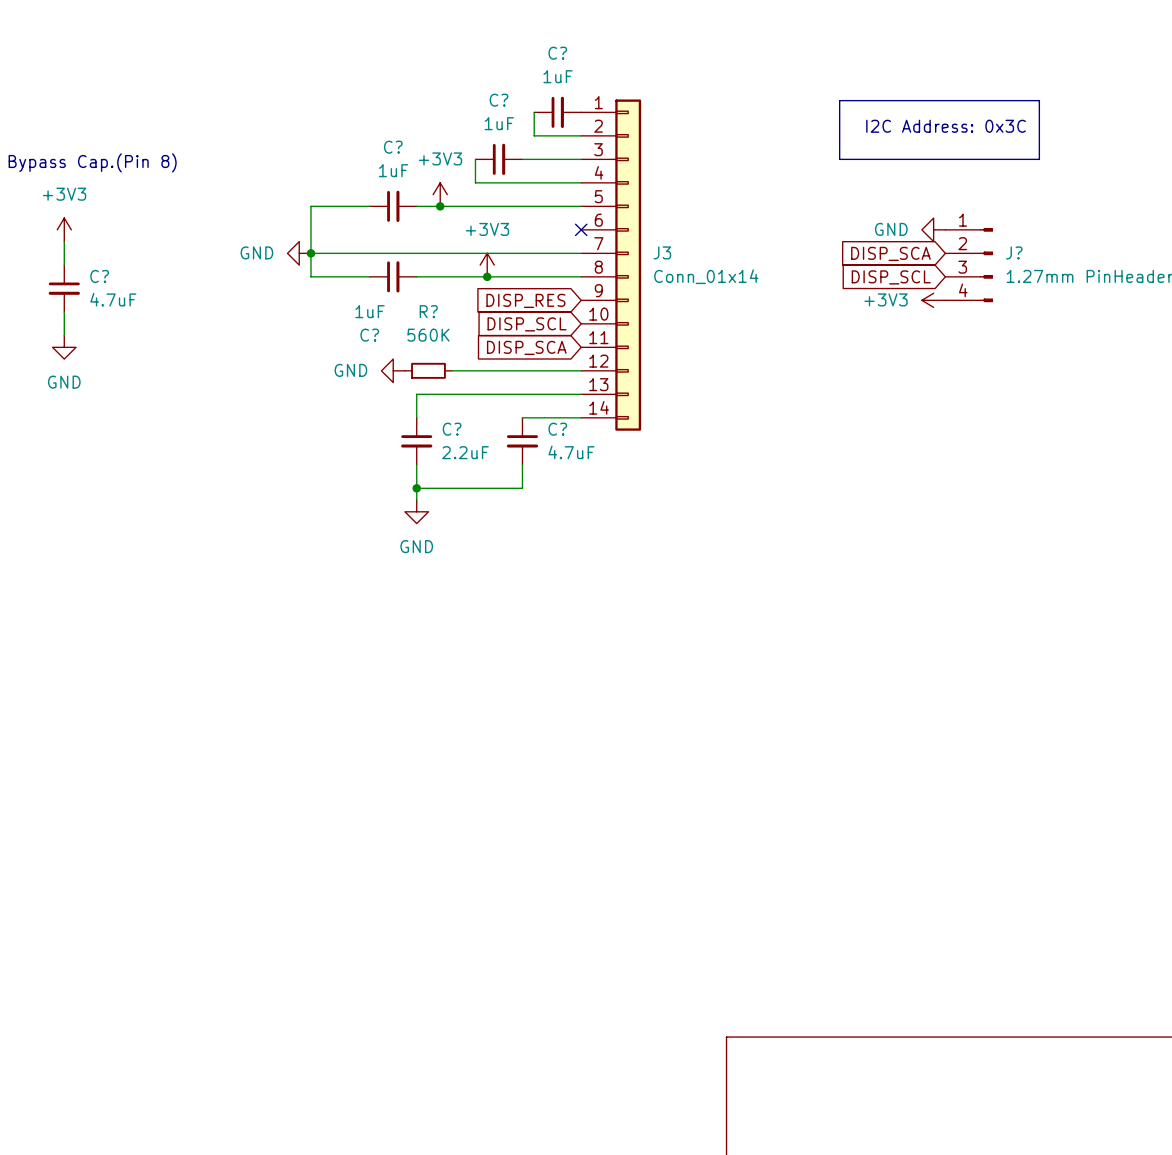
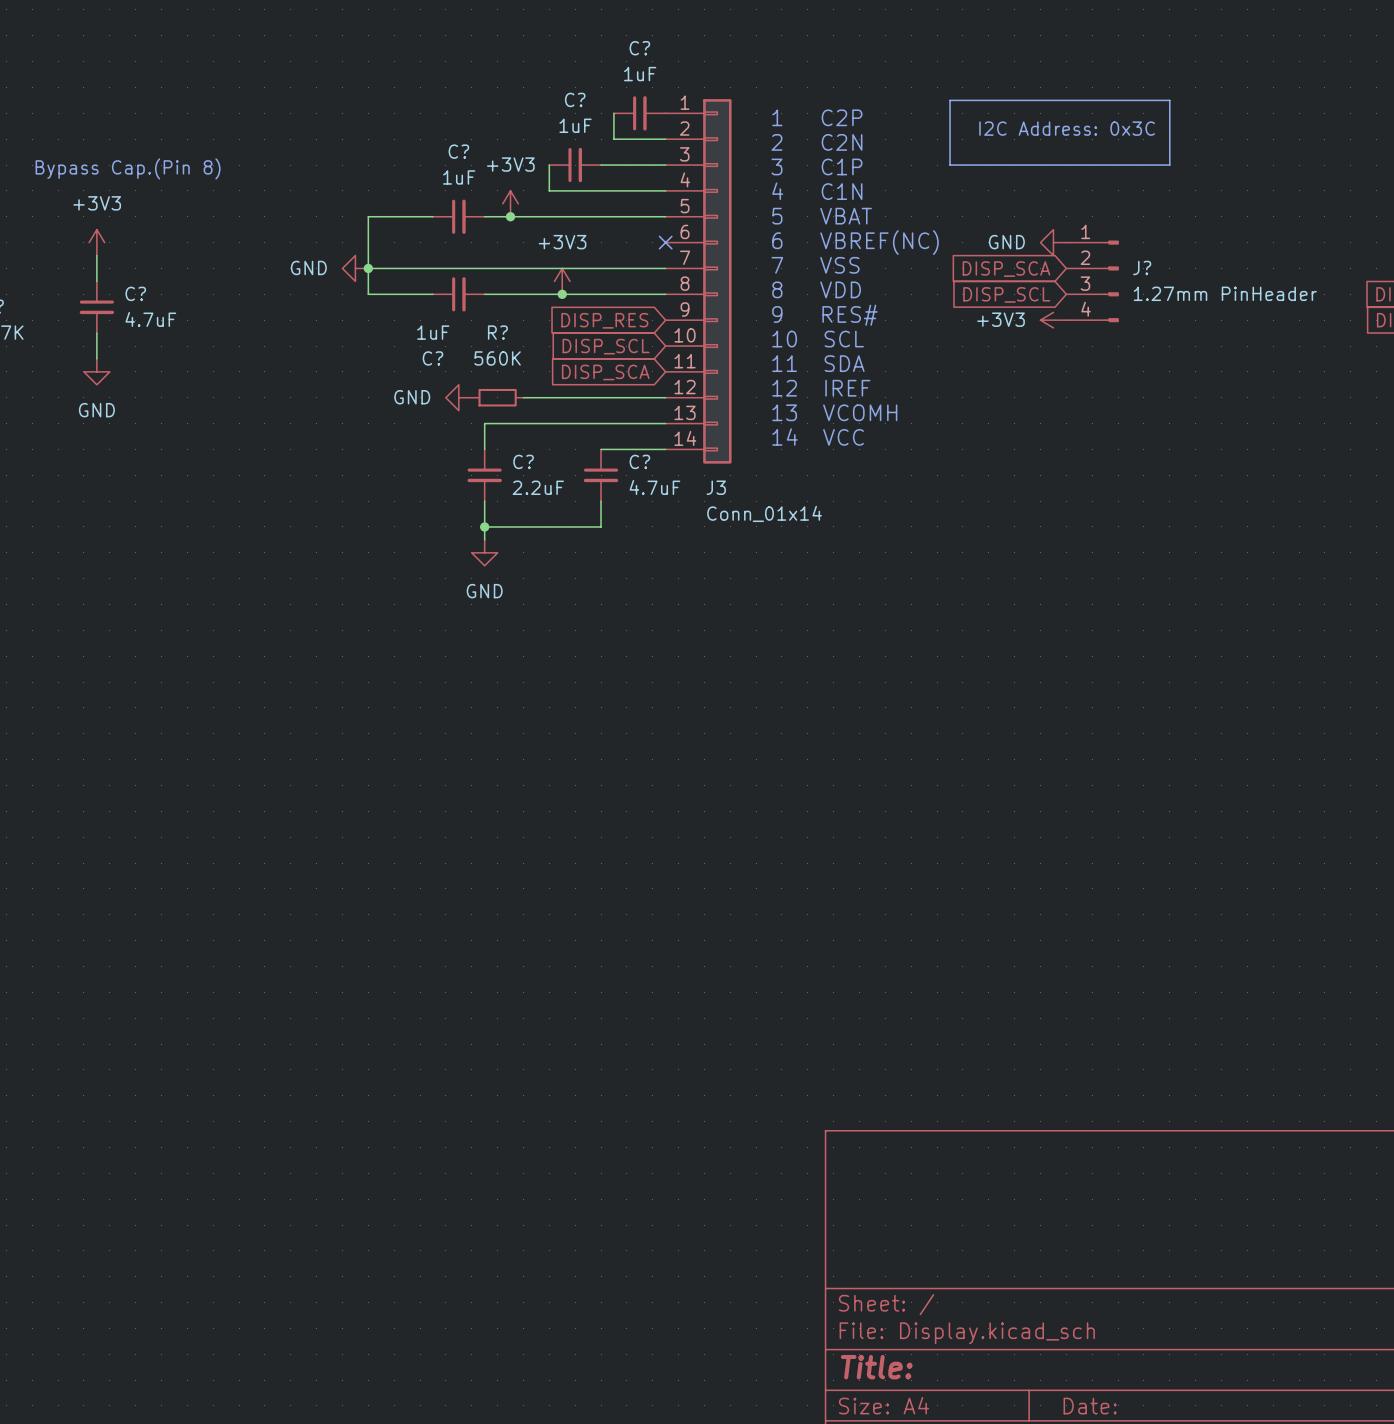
text: none -> 1 C2P (817, 117)
text: none -> 2 C2N (816, 142)
text: none -> 3 C1P (816, 166)
text: none -> 4 C1N (817, 191)
text: none -> 5 VBAT (822, 216)
text: none -> 6 VBREF(NC) (855, 242)
text: none -> 7 VSS (815, 265)
J3 name position: J3 (662, 252) -> J3 (716, 487)
text: none -> 8 VDD (816, 289)
J3 value position: Conn_01x14 (706, 276) -> Conn_01x14 (764, 513)
text: none -> 9 RES# (824, 315)
text: none -> 10 SCL (818, 339)
text: none -> 11 SDA (818, 363)
text: none -> 12 IREF (821, 388)
text: none -> 13 VCOMH (834, 412)
text: none -> 14 VCC (818, 437)

